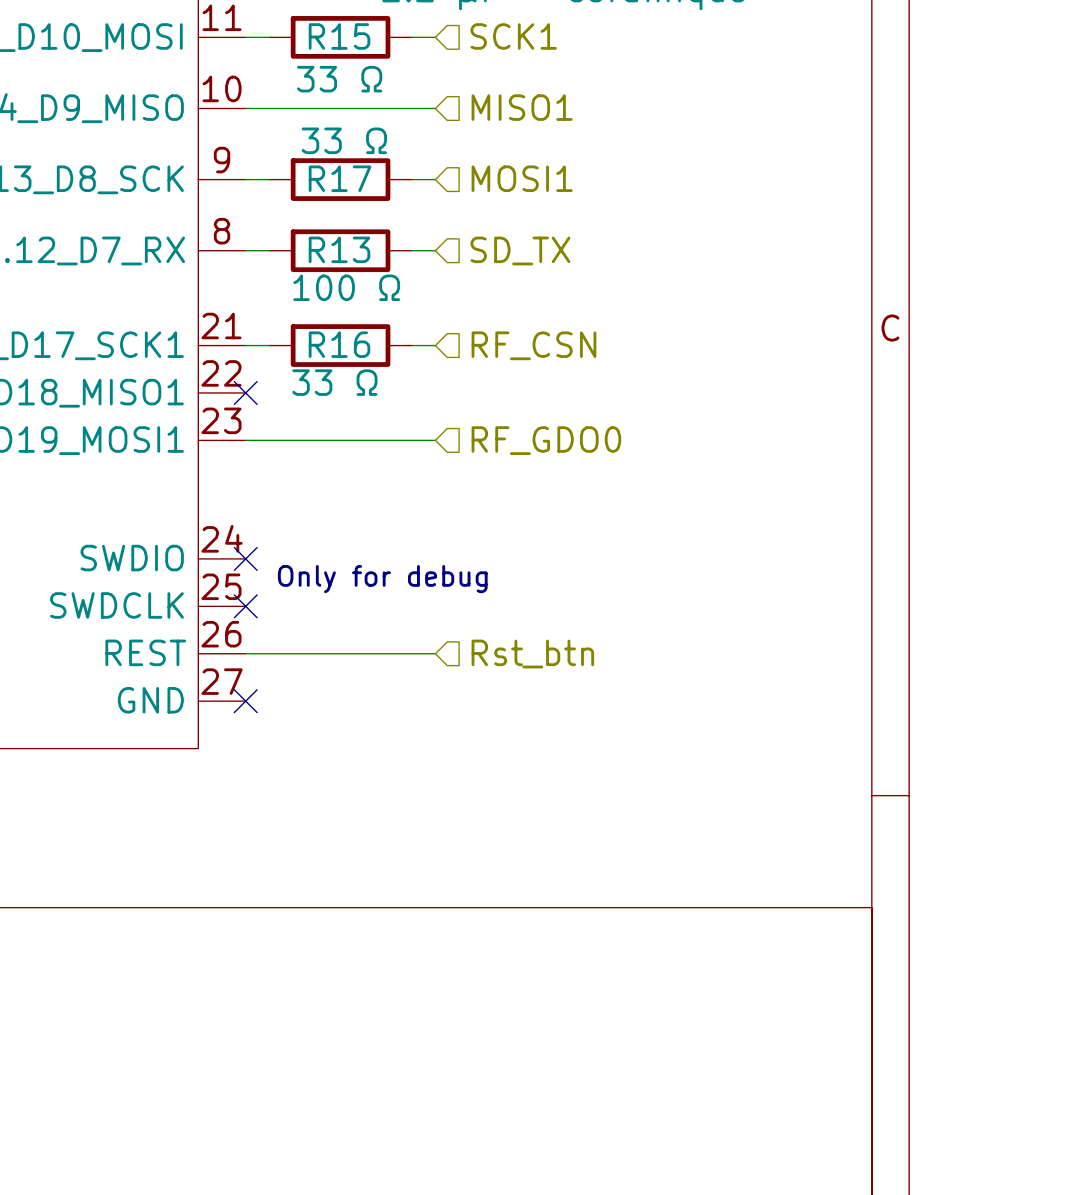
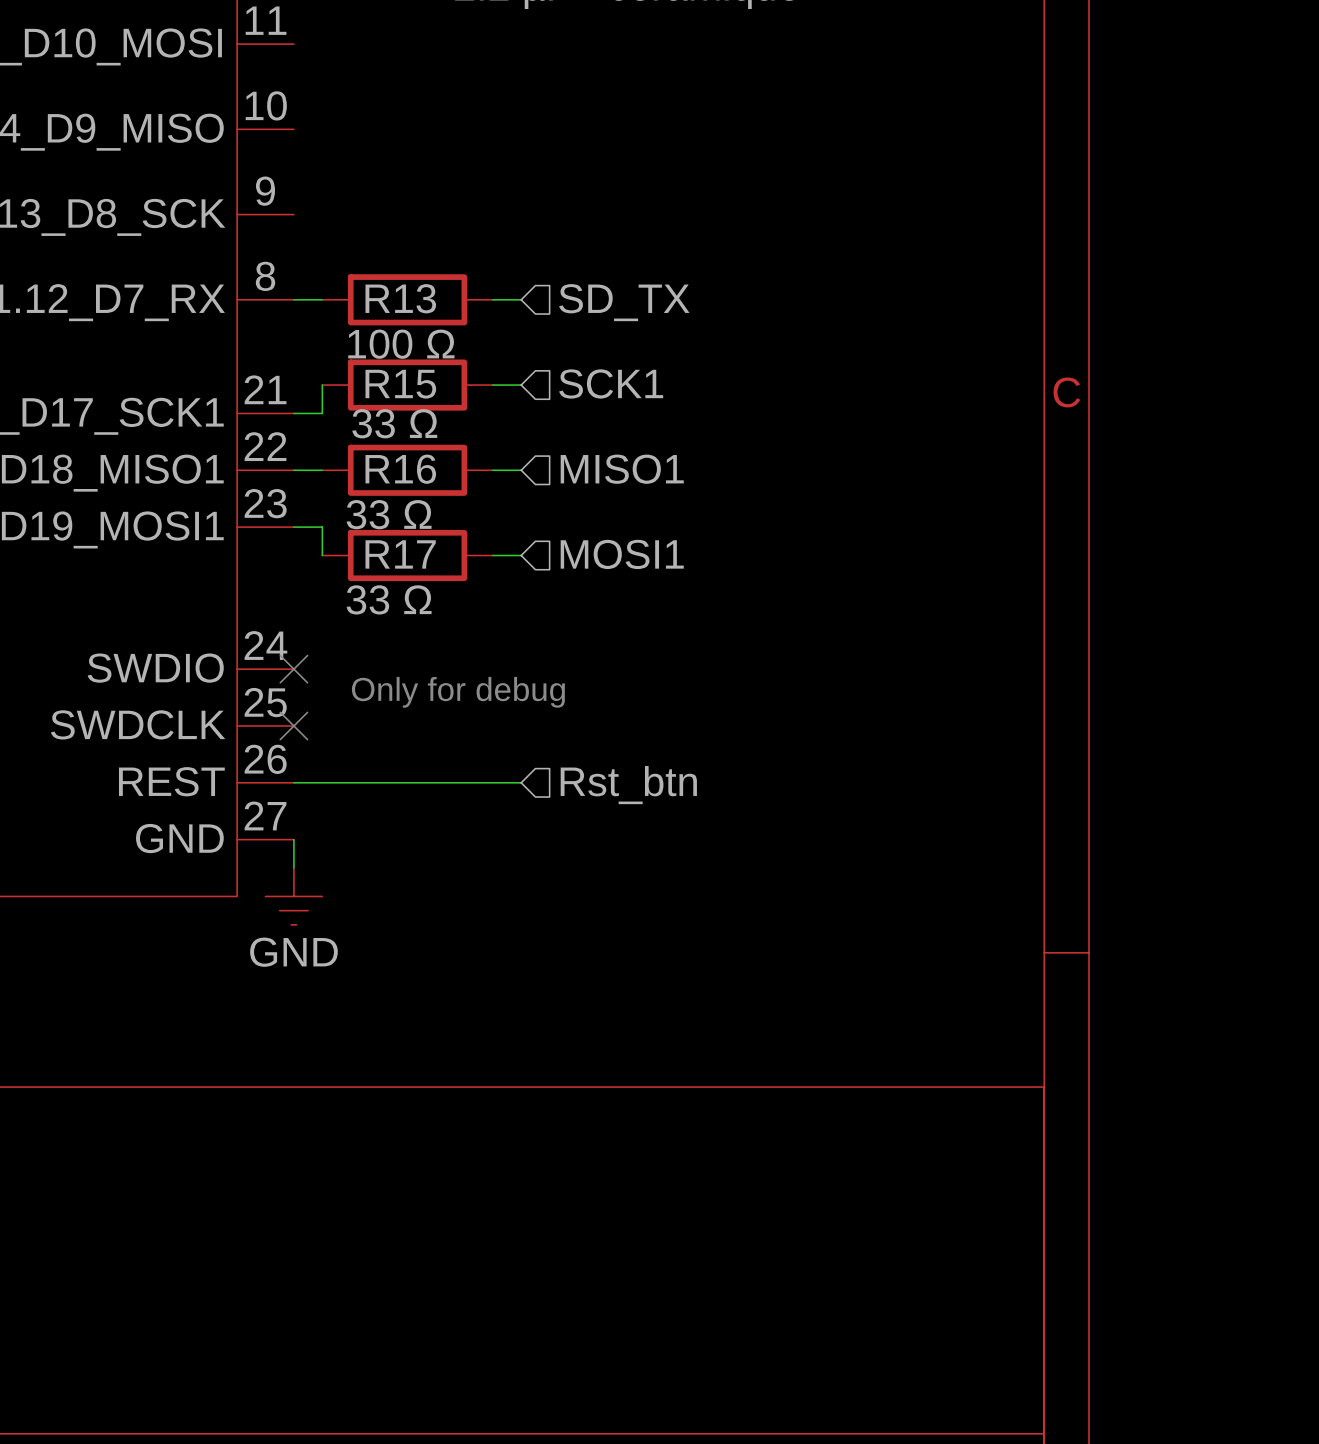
hierarchical label position: SCK1 (513, 36) -> SCK1 (611, 383)
wire: (245, 37) (269, 37) -> none
R15 position: (340, 37) -> (407, 385)
wire: (411, 37) (435, 37) -> (492, 385) (521, 385)
R15 value position: 33 Ω (339, 79) -> 33 Ω (394, 423)
hierarchical label position: MISO1 (522, 107) -> MISO1 (622, 469)
wire: (245, 108) (435, 108) -> none
R17 value position: 33 Ω (344, 140) -> 33 Ω (389, 599)
hierarchical label position: MOSI1 (522, 178) -> MOSI1 (622, 554)
wire: (245, 179) (269, 179) -> (293, 470) (322, 470)
R17 position: (340, 179) -> (407, 555)
wire: (411, 179) (435, 179) -> (492, 470) (521, 470)
wire: none -> (322, 385) (322, 413)
R16 position: (340, 345) -> (407, 470)
wire: (411, 345) (435, 345) -> (492, 555) (521, 555)
hierarchical label: RF_CSN (533, 345) -> none
no-connect mark: (245, 392) -> none
wire: (269, 440) (435, 440) -> (322, 527) (322, 555)
hierarchical label: RF_GDO0 (546, 440) -> none
wire: none -> (293, 839) (293, 868)
no-connect mark: (245, 701) -> none
power symbol: none -> GND (293, 896)

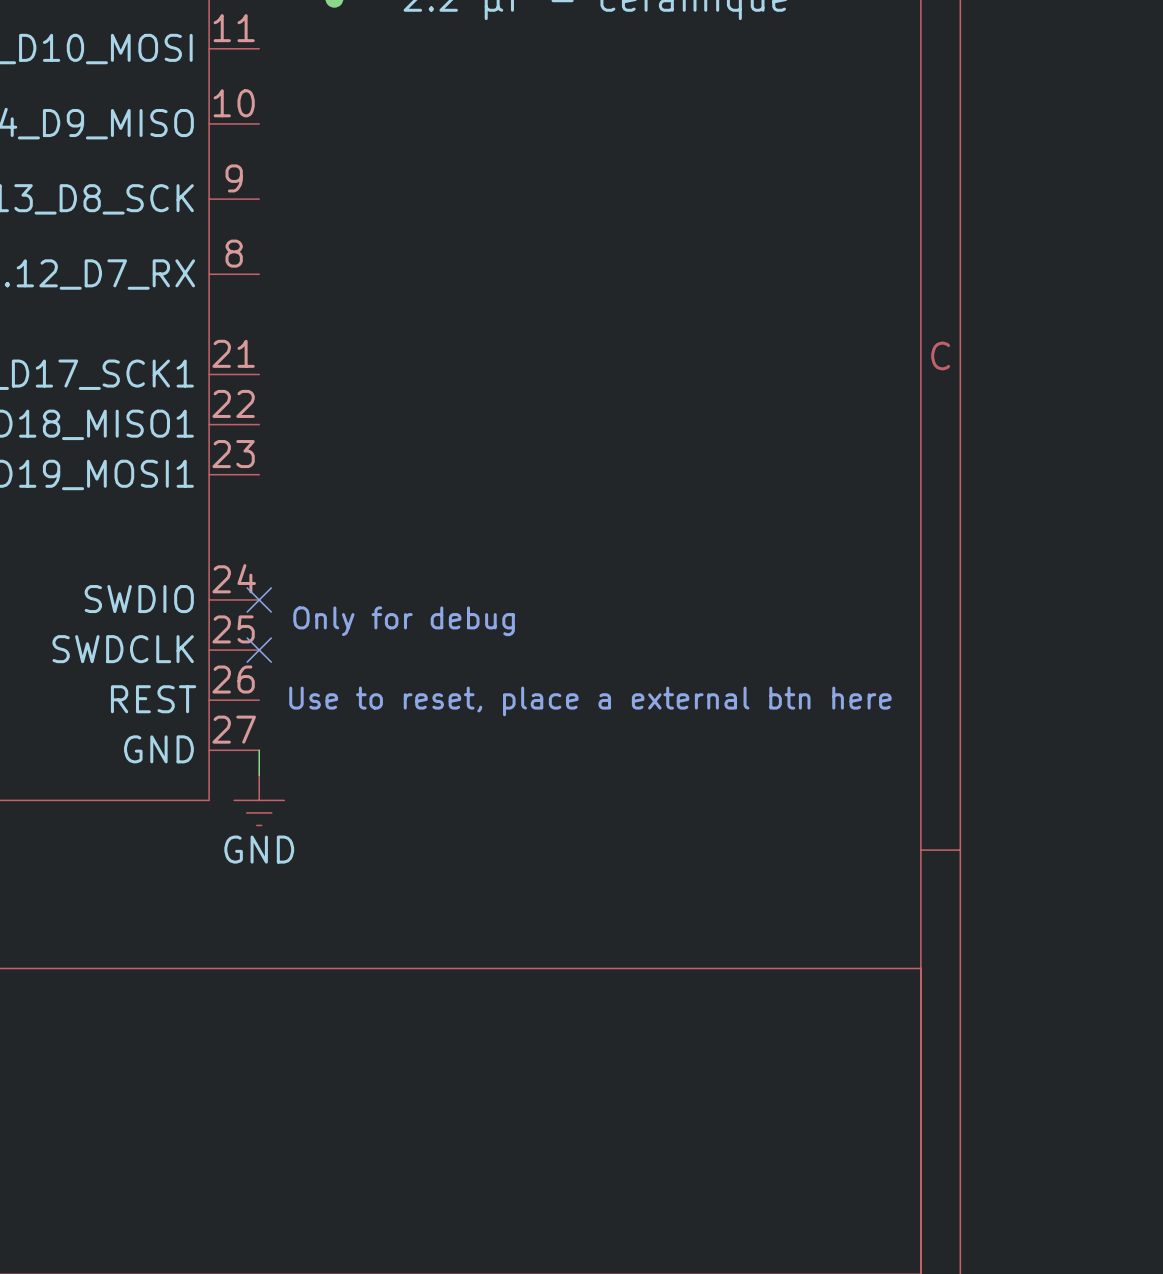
wire: (293, 299) (322, 299) -> none
R13: 100 Ω (407, 299) -> none
wire: (492, 299) (521, 299) -> none
hierarchical label: SD_TX (624, 302) -> none
hierarchical label: SCK1 (611, 383) -> none
wire: (322, 385) (322, 413) (293, 413) -> none
R15: 33 Ω (407, 385) -> none
wire: (492, 385) (521, 385) -> none
hierarchical label: MISO1 (622, 469) -> none
wire: (293, 470) (322, 470) -> none
R16: 33 Ω (407, 470) -> none
wire: (492, 470) (521, 470) -> none
wire: (293, 527) (322, 527) (322, 555) -> none
hierarchical label: MOSI1 (622, 554) -> none
R17: 33 Ω (407, 555) -> none
wire: (492, 555) (521, 555) -> none
wire: (293, 782) (521, 782) -> none
text: none -> Use to reset, place a external btn here (590, 701)
hierarchical label: Rst_btn (628, 785) -> none

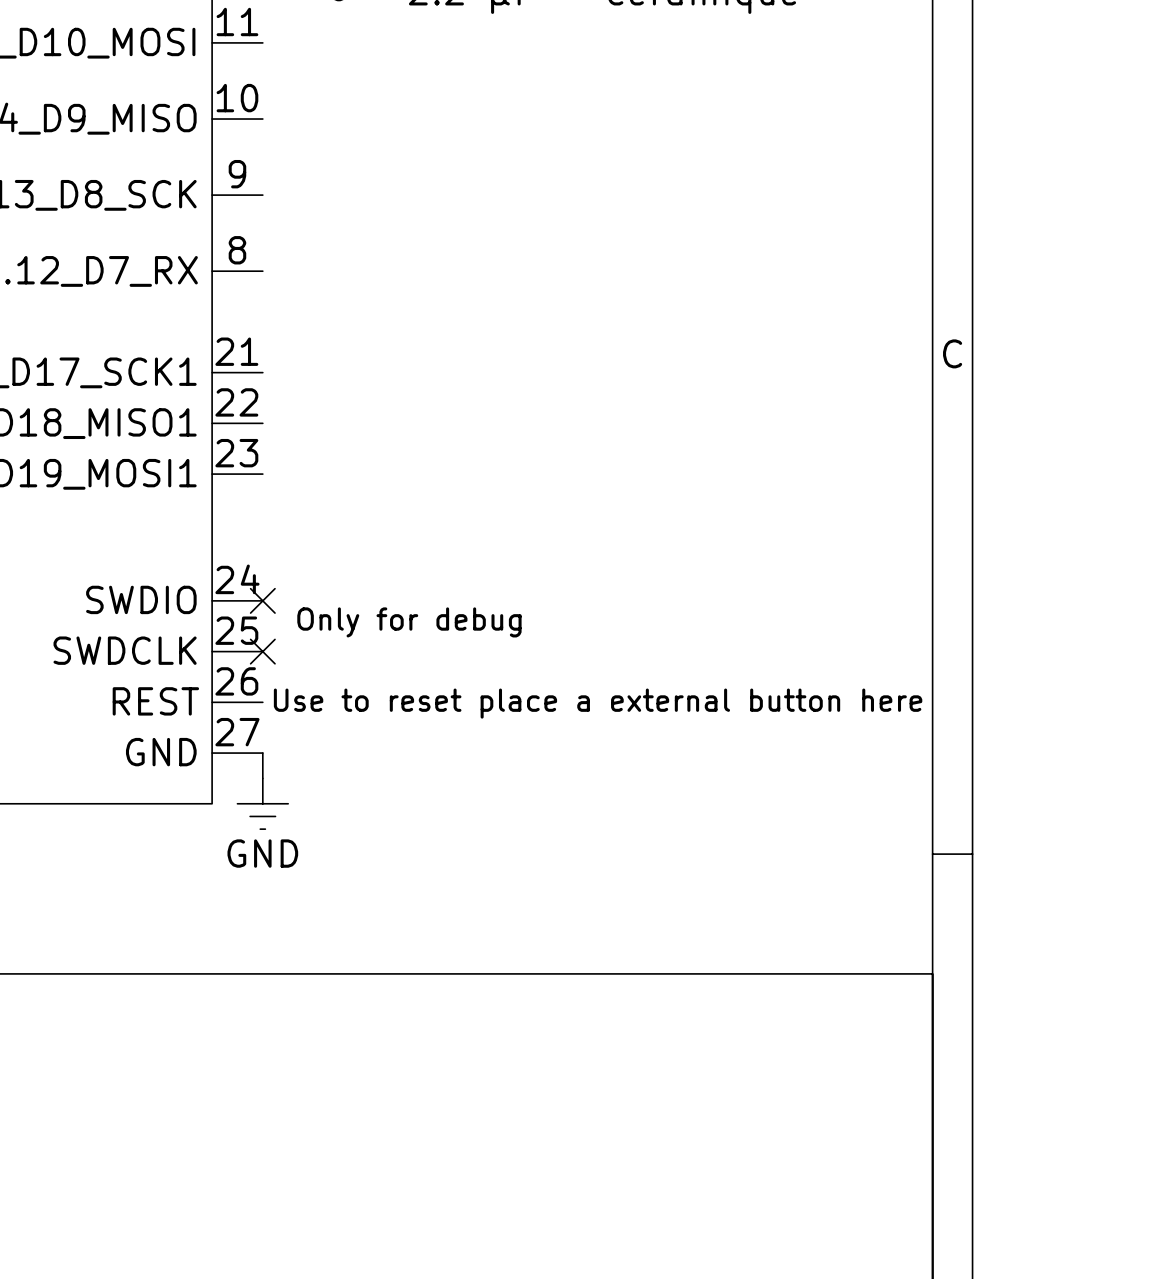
text: Use to reset, place a external btn here (590, 701) -> Use to reset place a external button here (598, 703)

